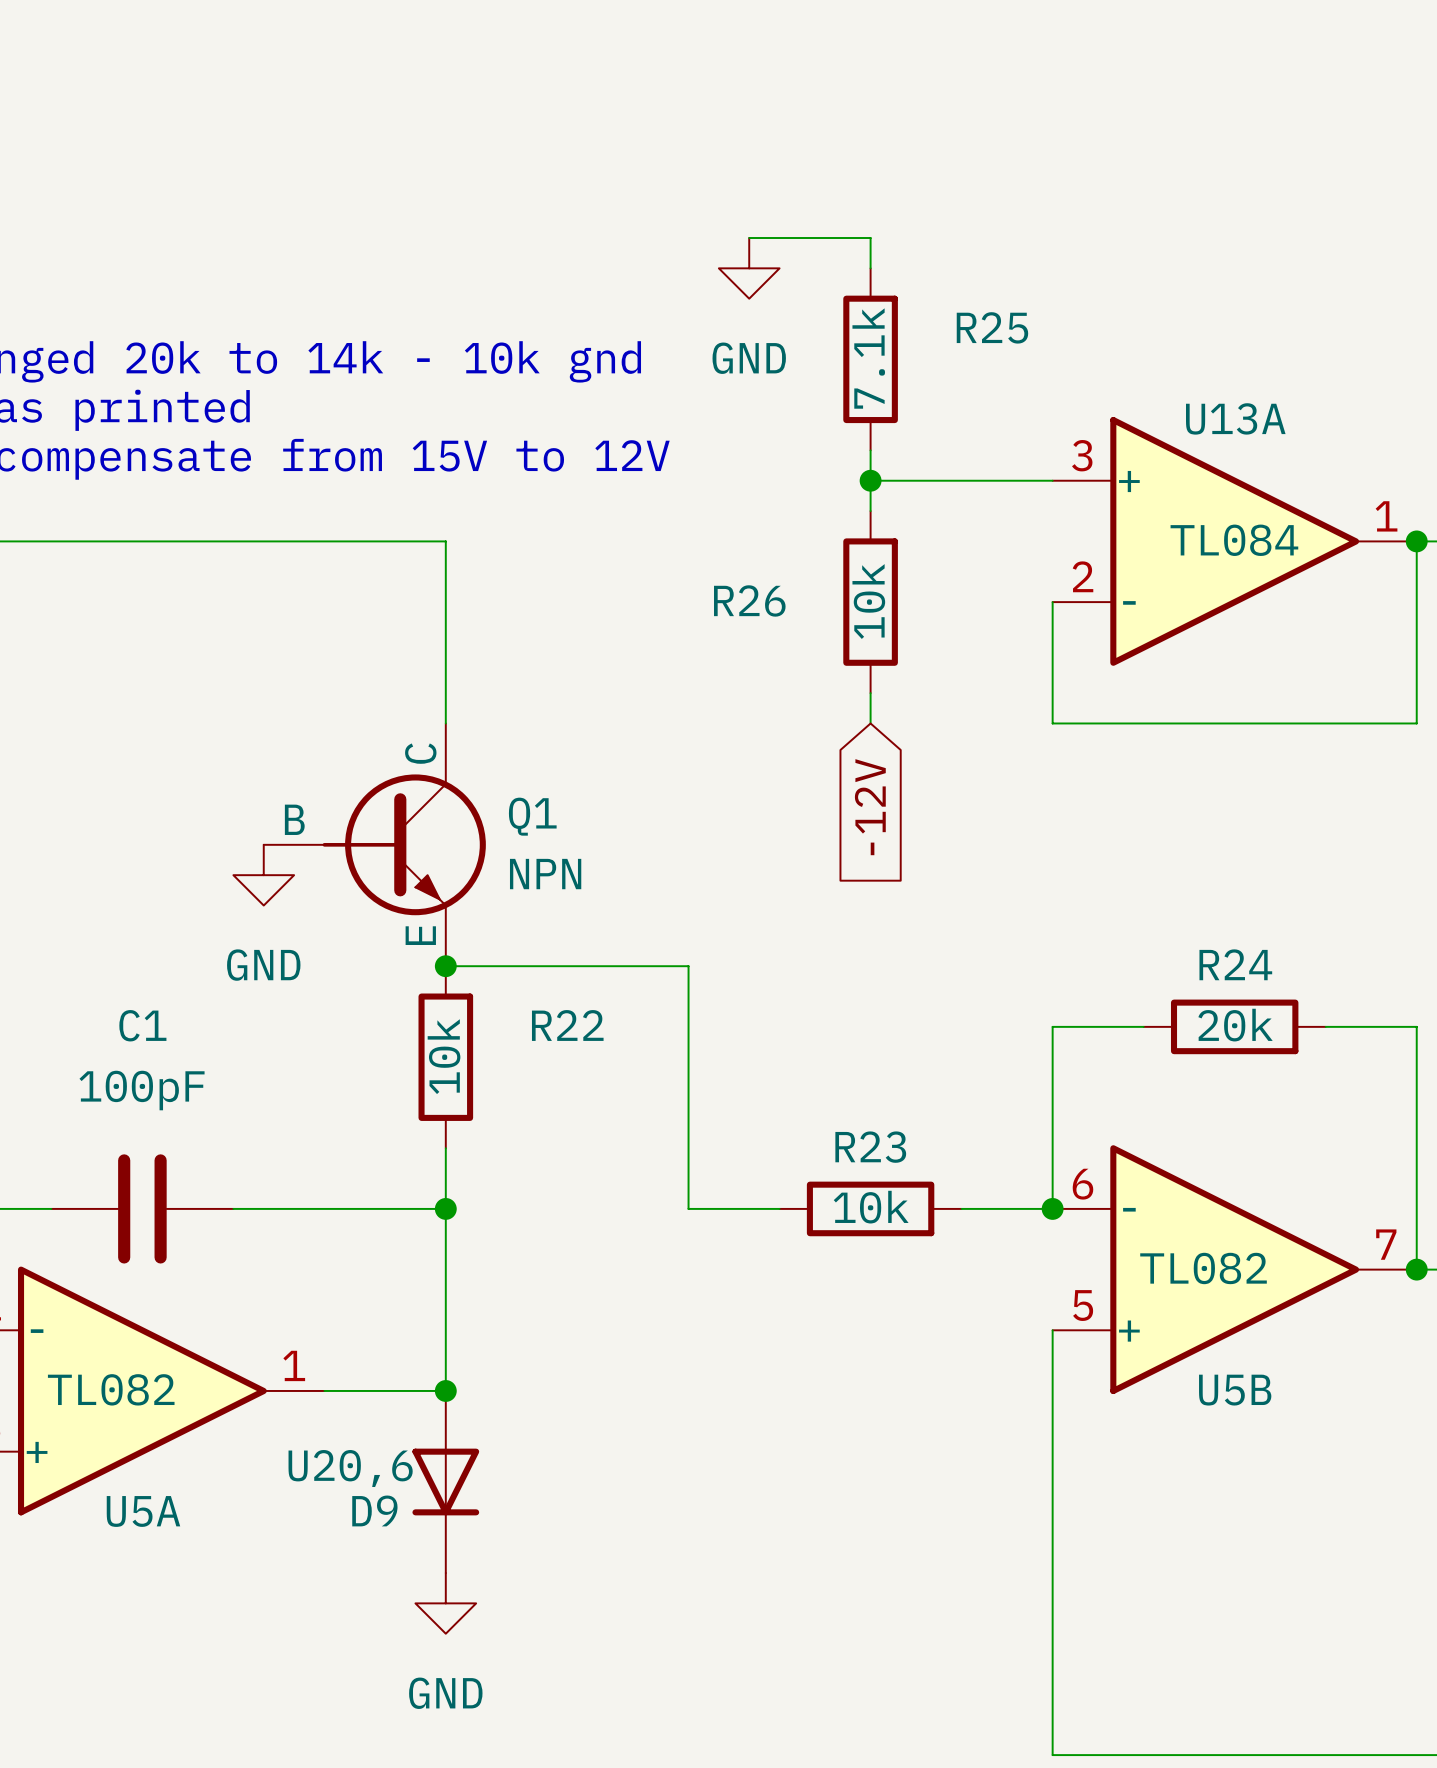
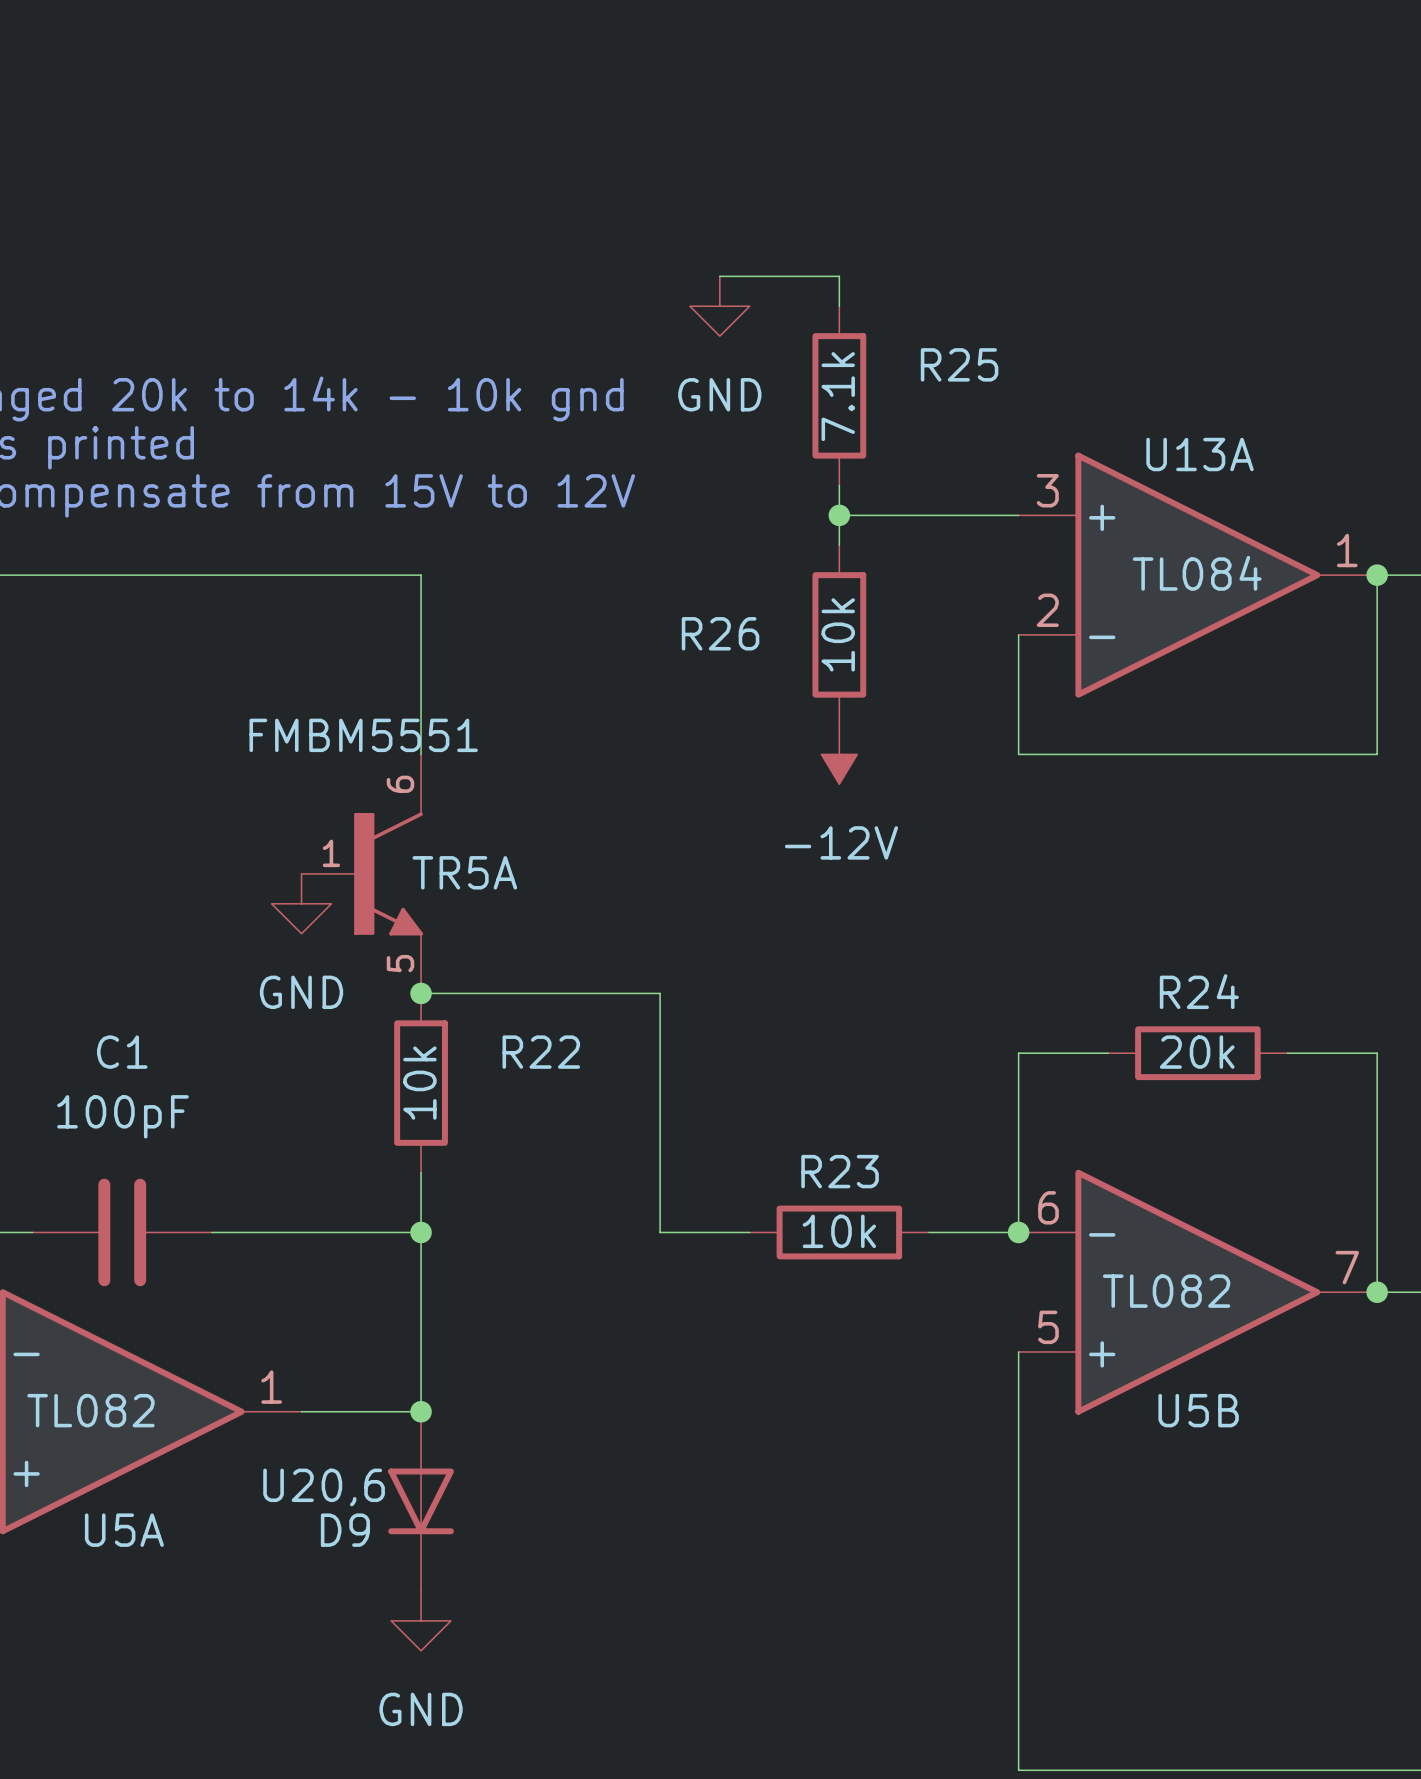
power symbol: none -> -12V (839, 754)
global label: -12V (870, 807) -> none
Q1: NPN (374, 844) -> none
TR5A: none -> FMBM5551 (362, 873)
power symbol position: GND (263, 875) -> GND (301, 903)

